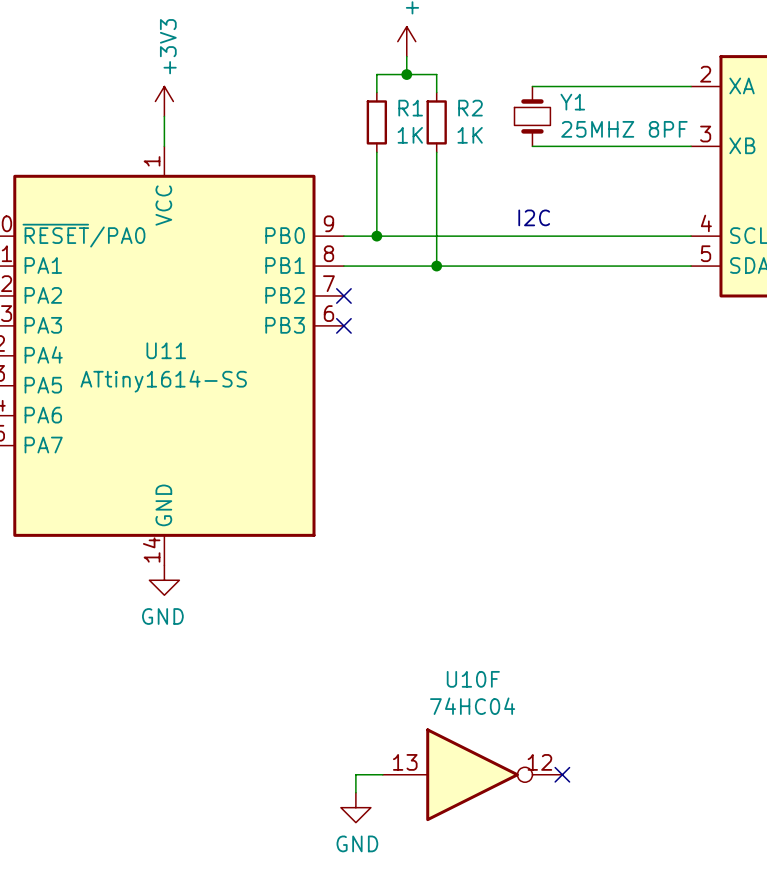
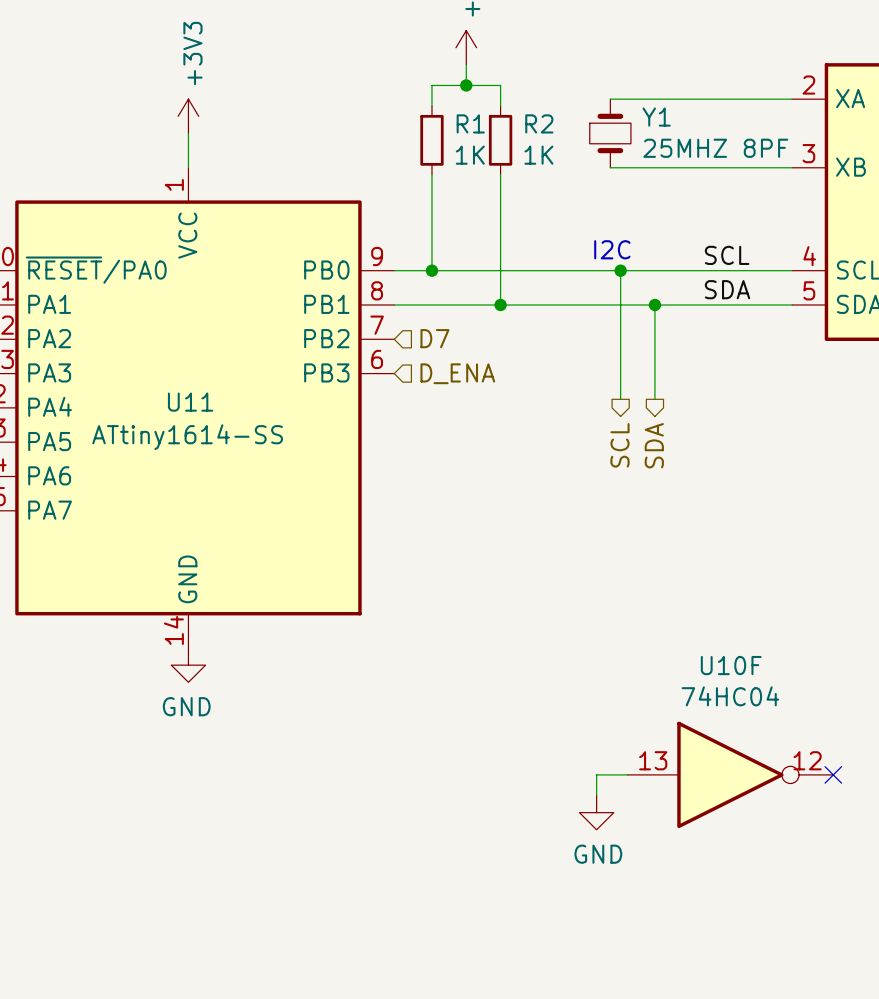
label: none -> SCL (727, 255)
wire: none -> (620, 270) (620, 399)
junction: none -> (620, 270)
label: none -> SDA (727, 289)
wire: none -> (654, 304) (654, 399)
junction: none -> (654, 304)
no-connect mark: (343, 295) -> none
hierarchical label: none -> D7 (434, 338)
no-connect mark: (343, 325) -> none
hierarchical label: none -> D_ENA (457, 373)
hierarchical label: none -> SCL (620, 445)
hierarchical label: none -> SDA (654, 445)
no-connect mark: none -> (833, 774)
wire: (382, 774) (355, 774) (355, 792) -> (627, 774) (596, 774) (596, 795)
U10F position: (472, 774) -> (730, 774)
no-connect mark: (562, 774) -> none
power symbol position: GND (355, 807) -> GND (596, 812)

